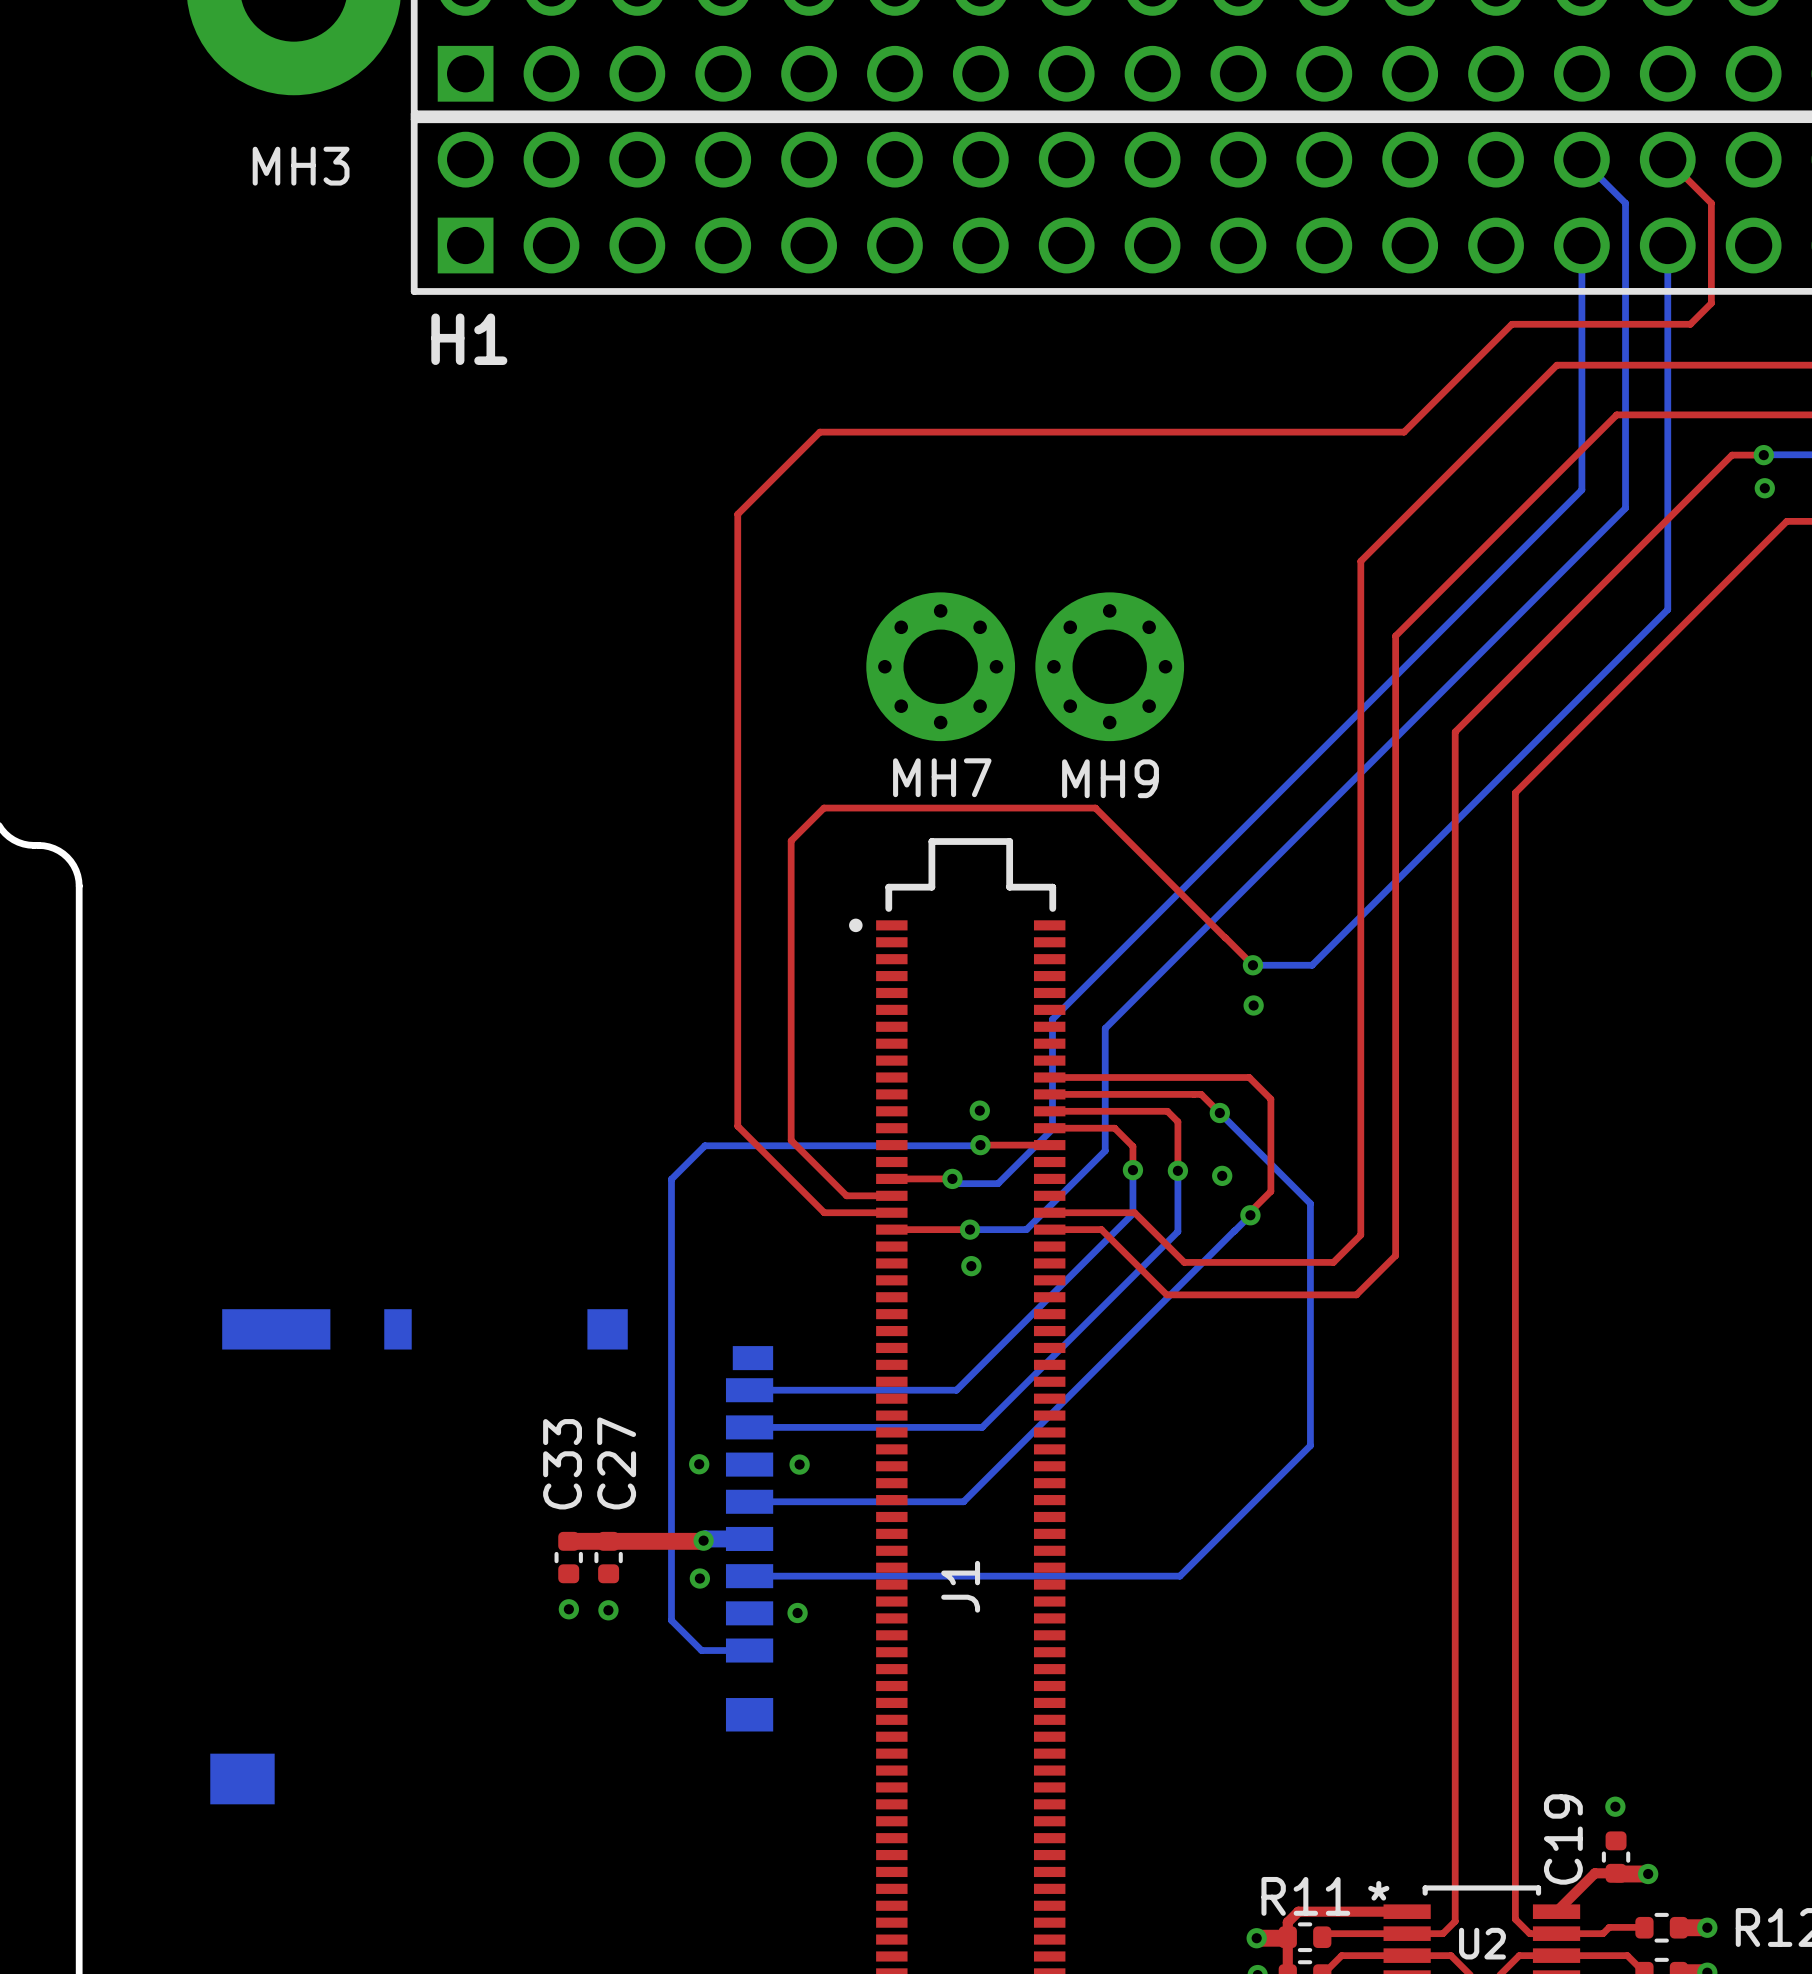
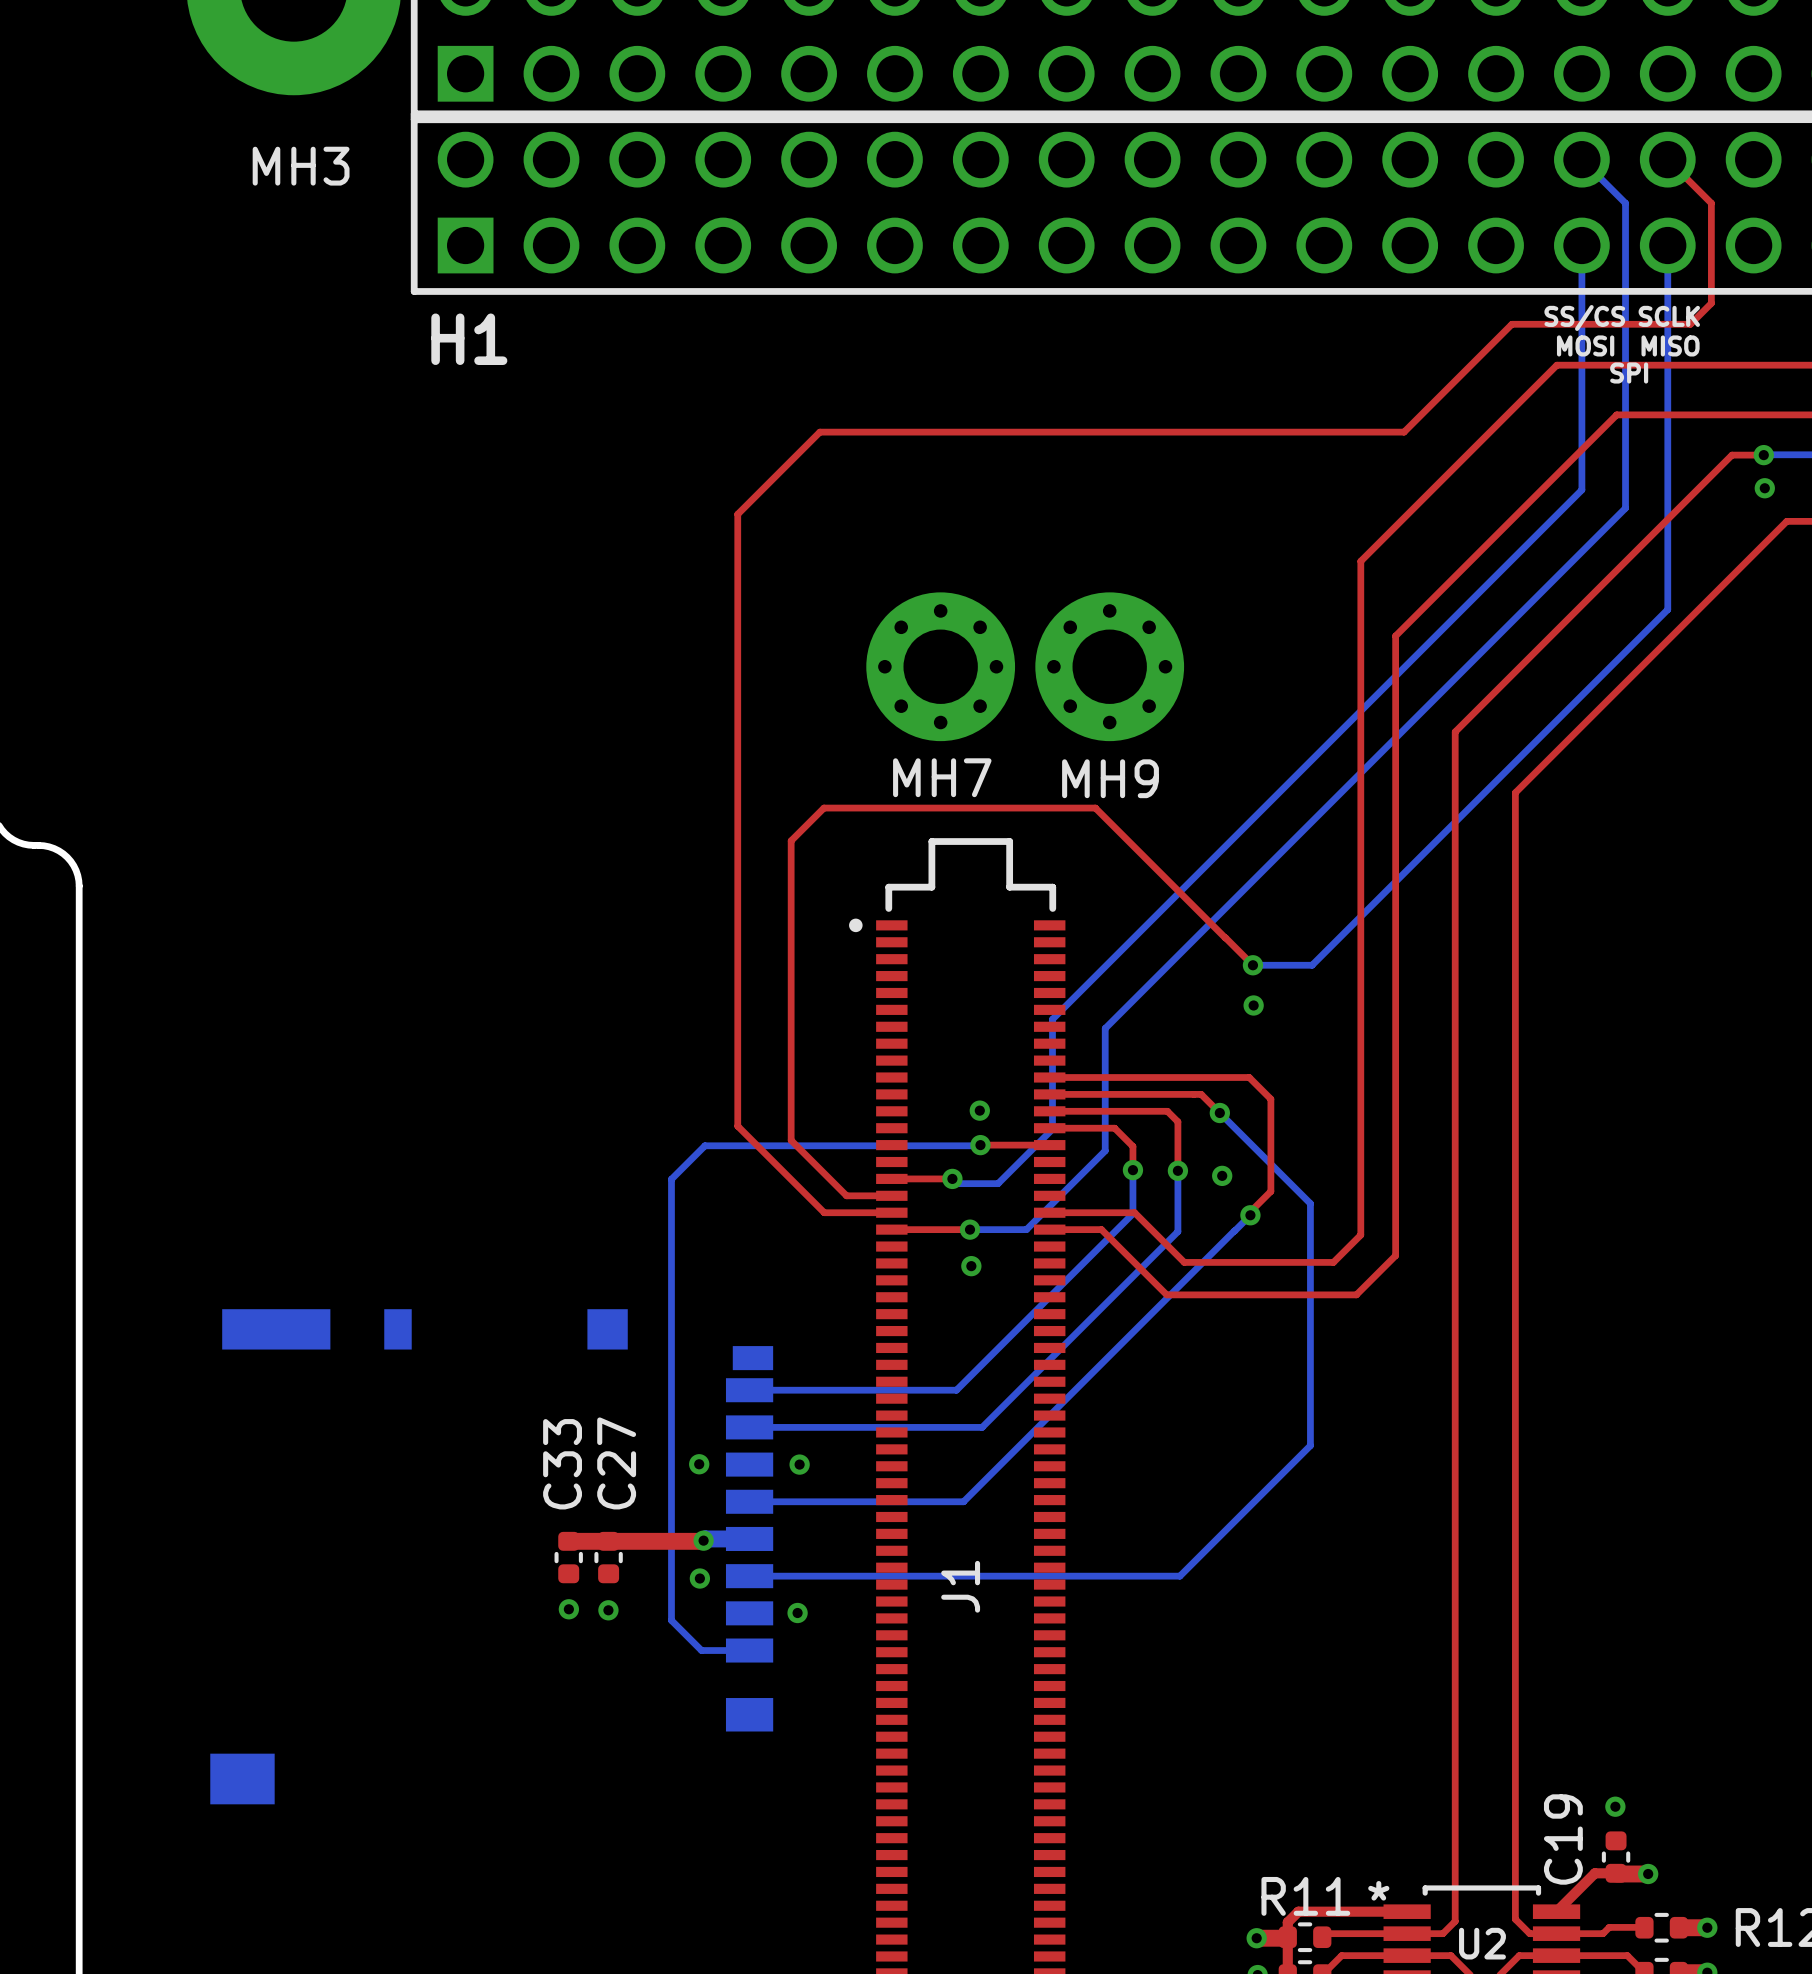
text: none -> SCLK (1669, 316)
text: none -> SS/CS (1584, 317)
text: none -> MOSI (1585, 345)
text: none -> MISO (1670, 345)
text: none -> SPI (1629, 373)

